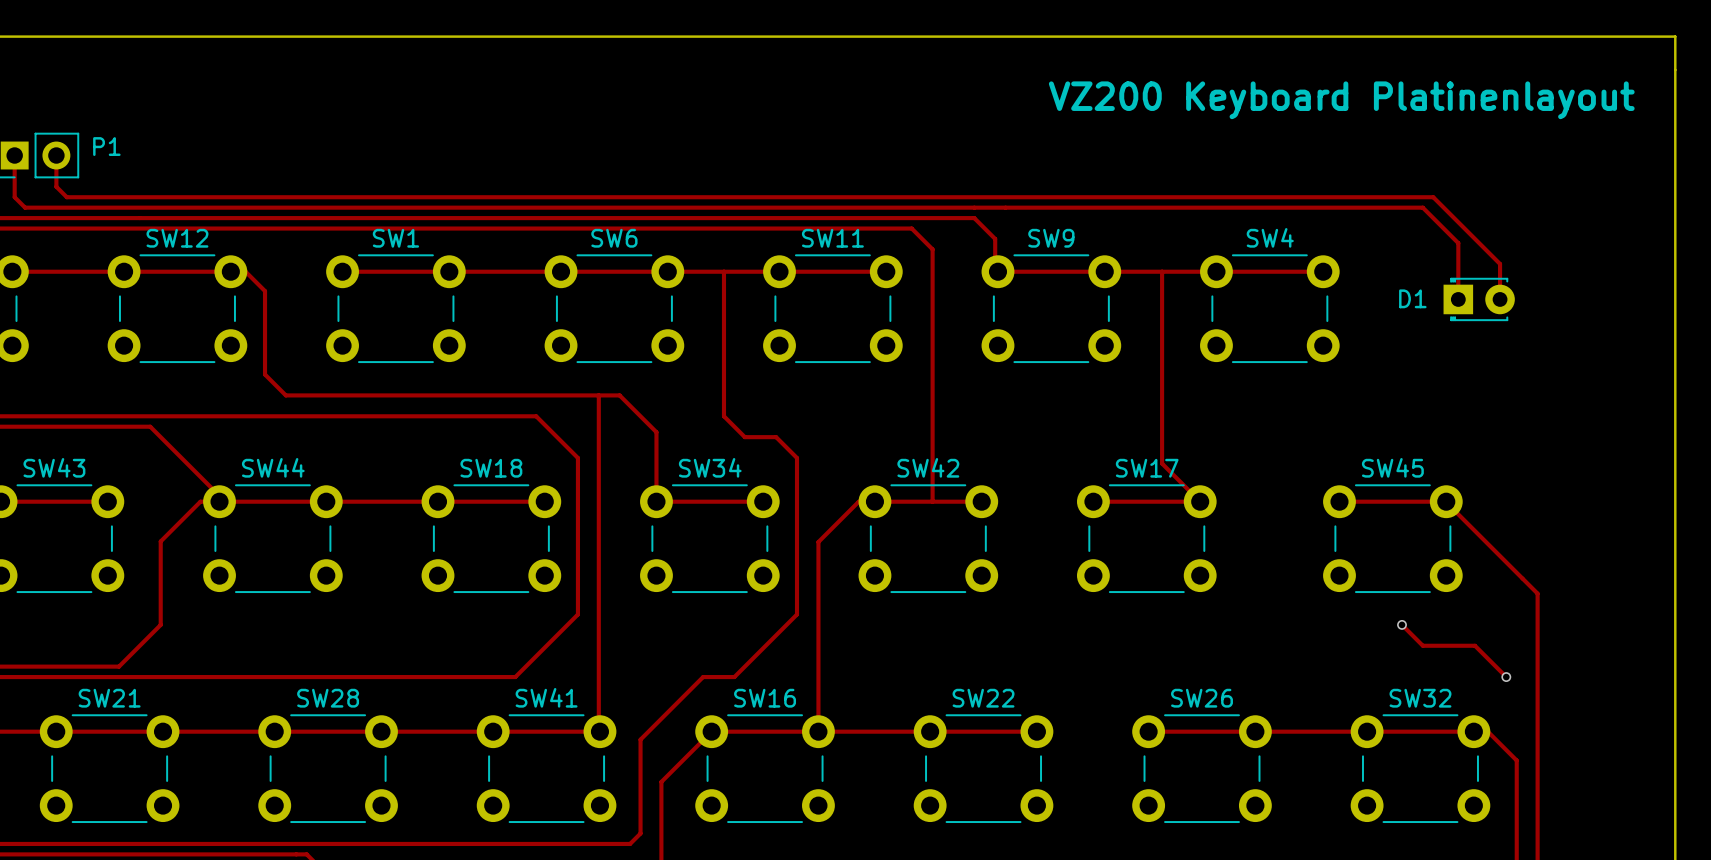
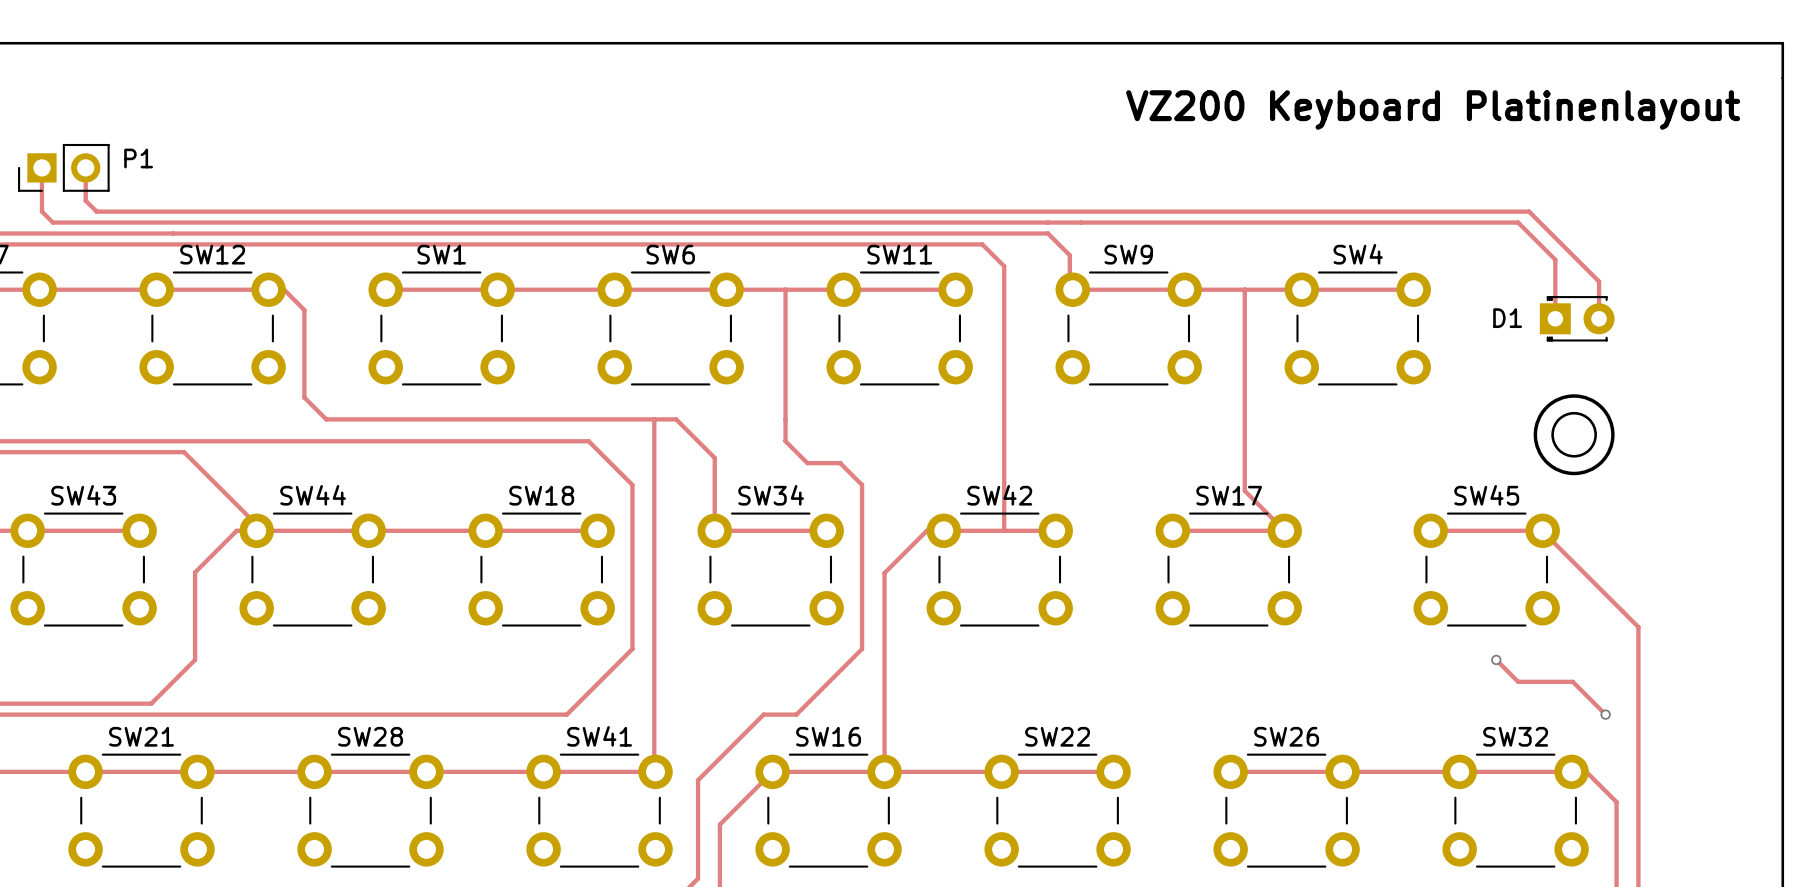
drawing: none -> [1533, 394, 1615, 476]
round board edge: none -> [1551, 411, 1597, 458]

